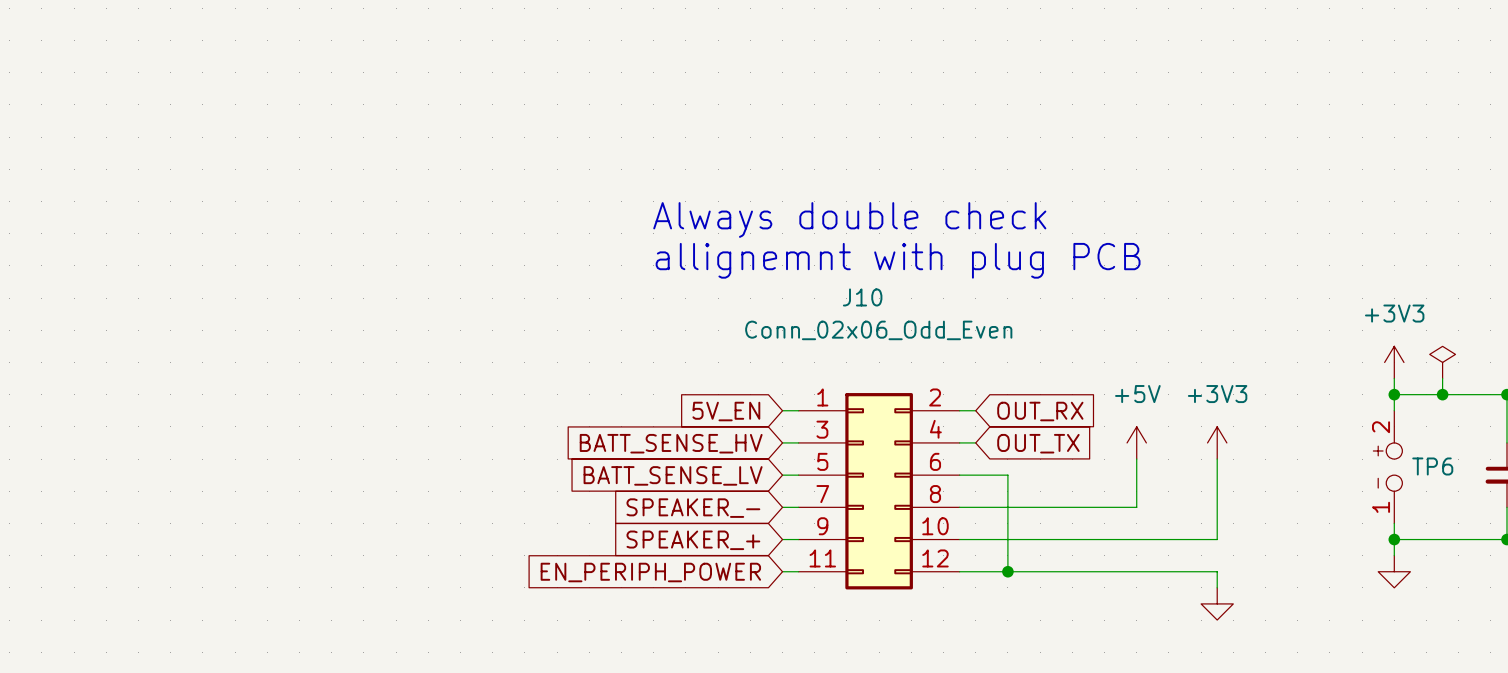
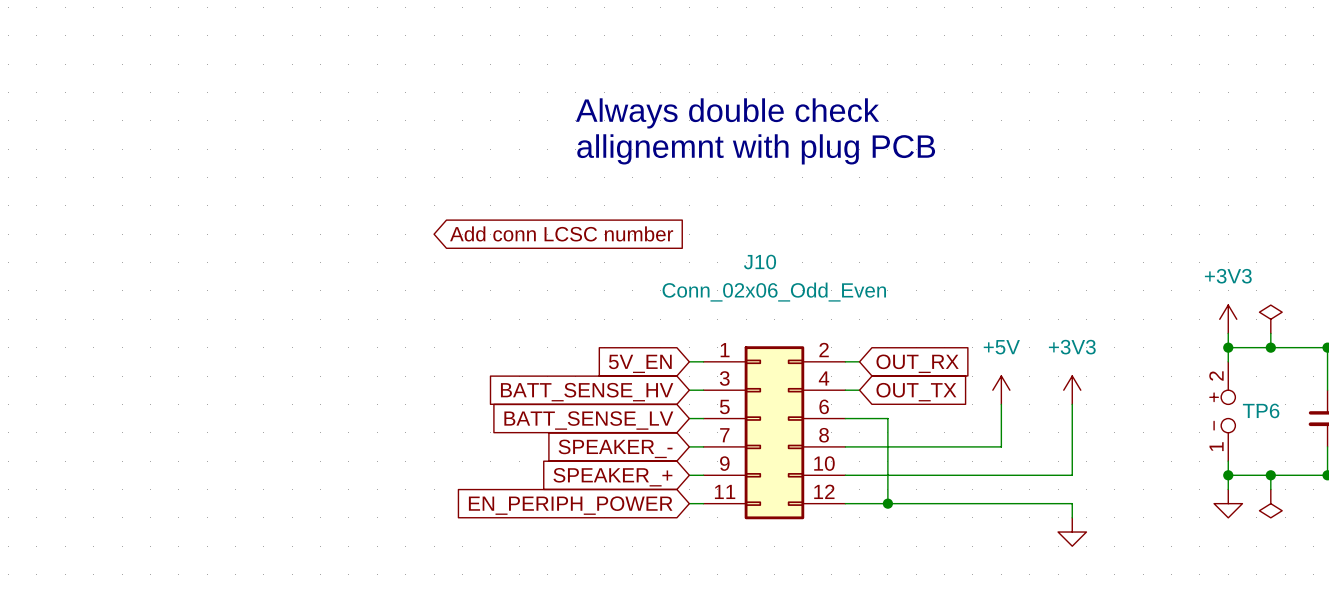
text position: Always double check (849, 219) -> Always double check (727, 113)
text position: allignemnt with plug PCB (898, 260) -> allignemnt with plug PCB (756, 149)
global label: none -> Add conn LCSC number (561, 233)
wire: none -> (1270, 475) (1270, 489)
junction: none -> (1270, 475)
power symbol: none -> (1270, 503)

